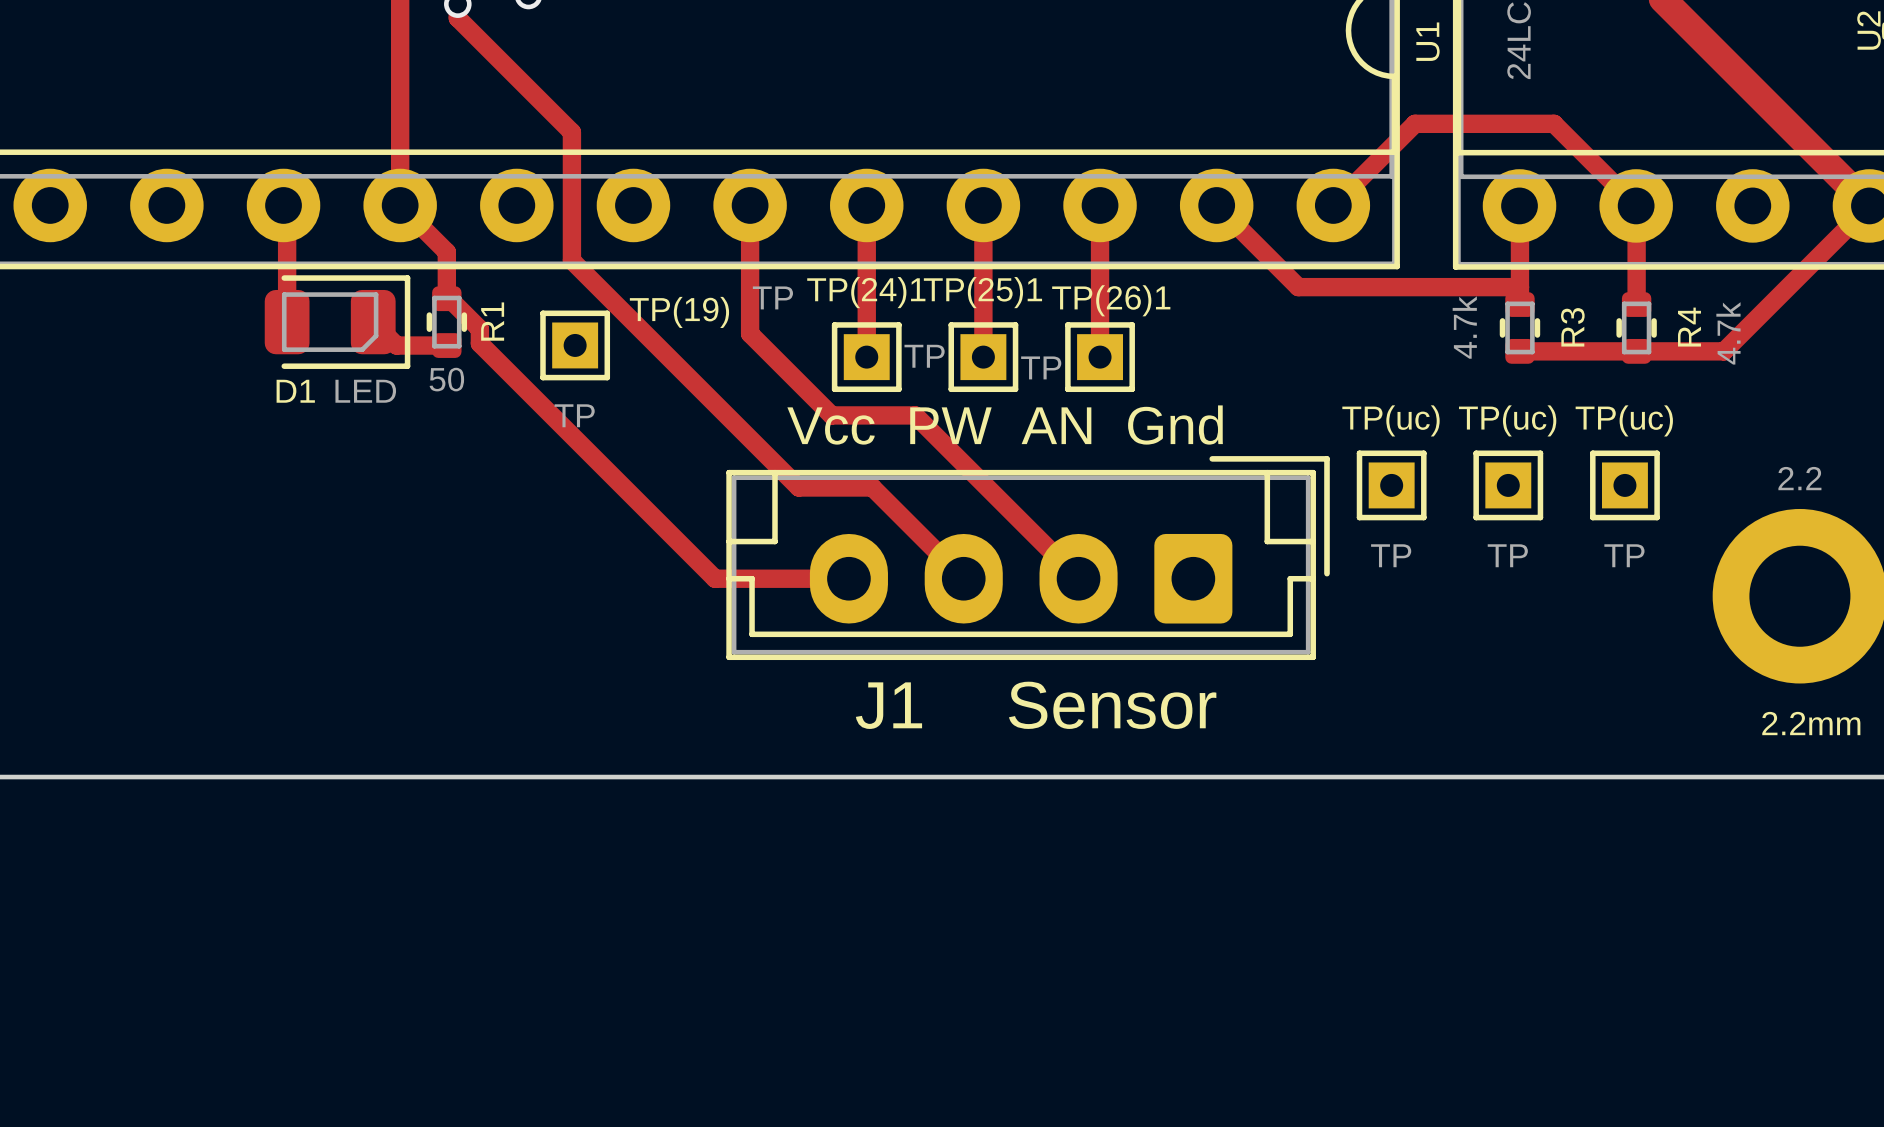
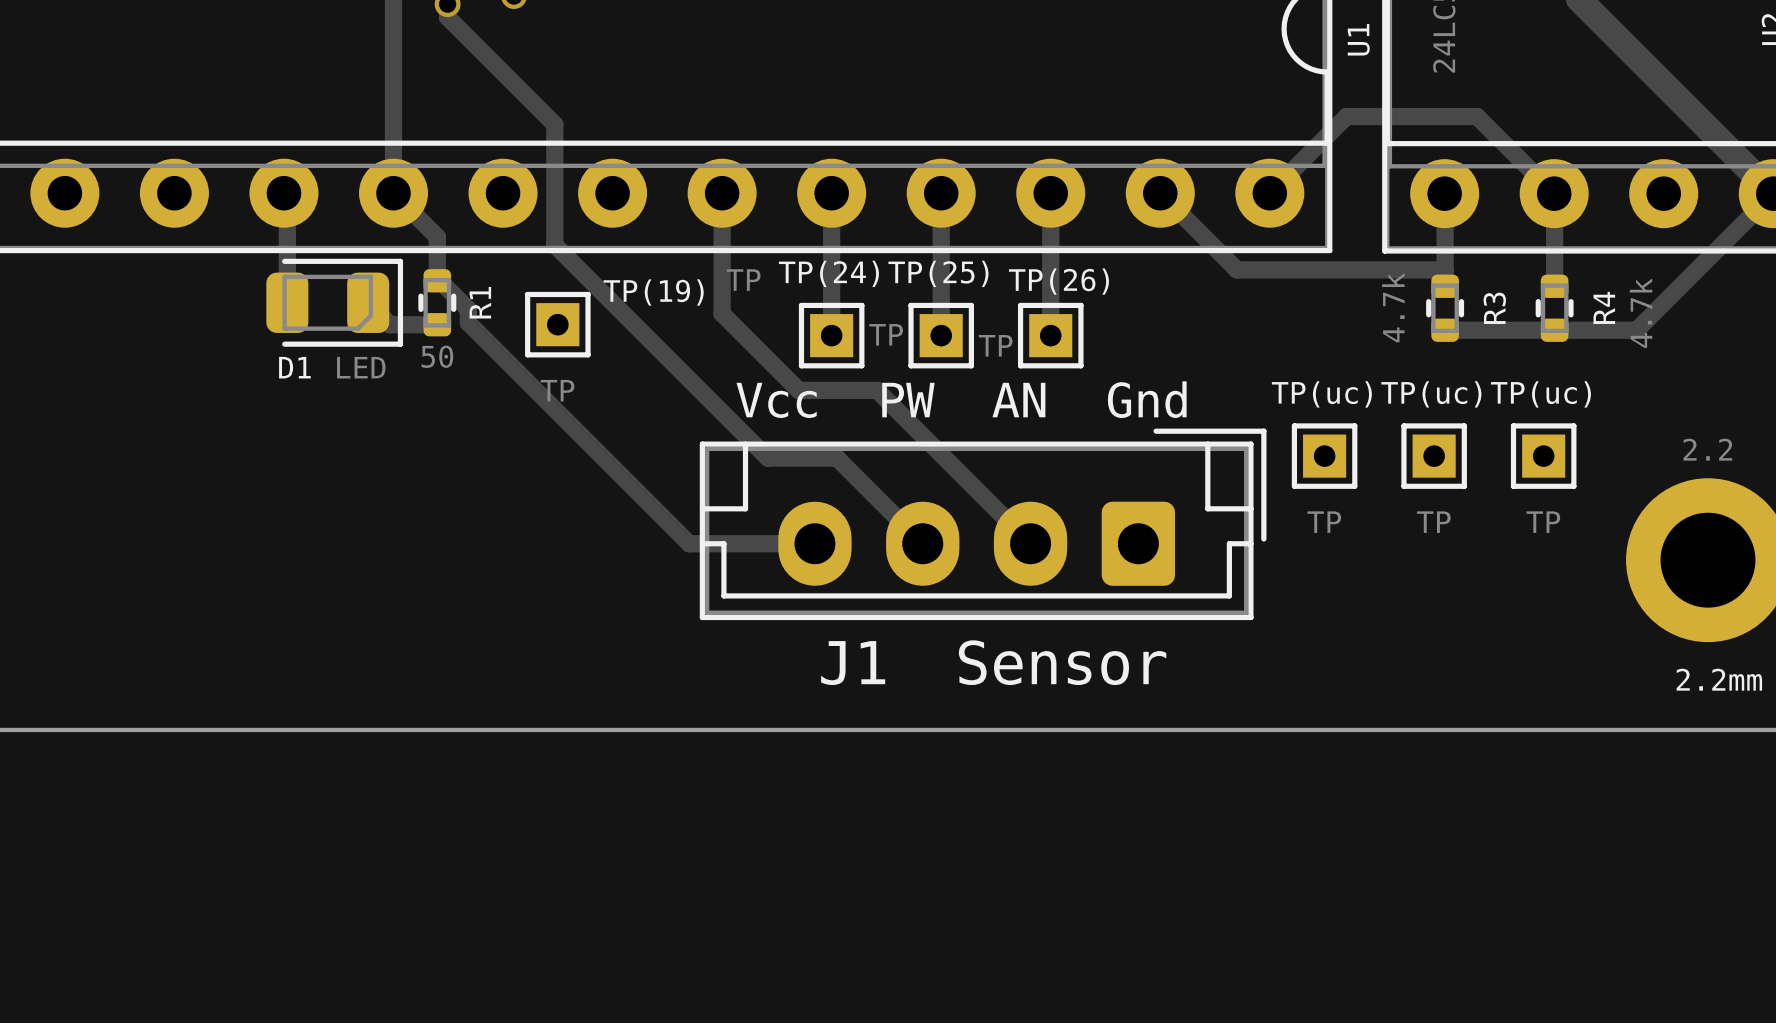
TP(24)1 name: TP(24)1 (866, 292) -> TP(24) (828, 273)
TP(25)1 name: TP(25)1 (982, 292) -> TP(25) (938, 273)
TP(26)1 name: TP(26)1 (1111, 300) -> TP(26) (1058, 281)

